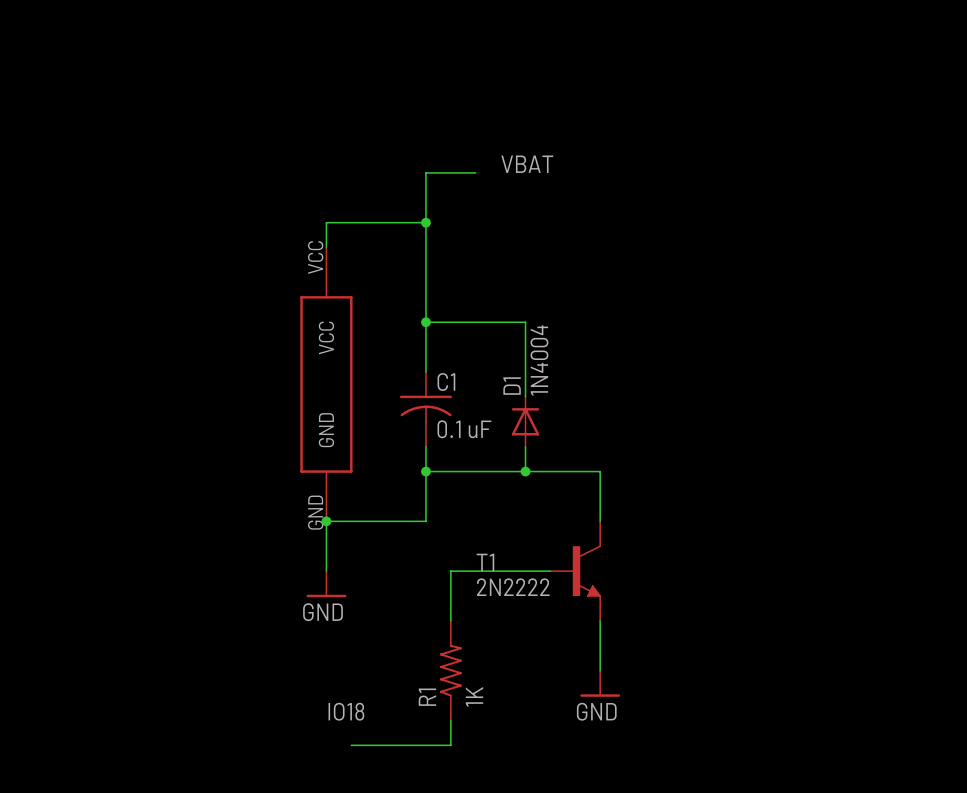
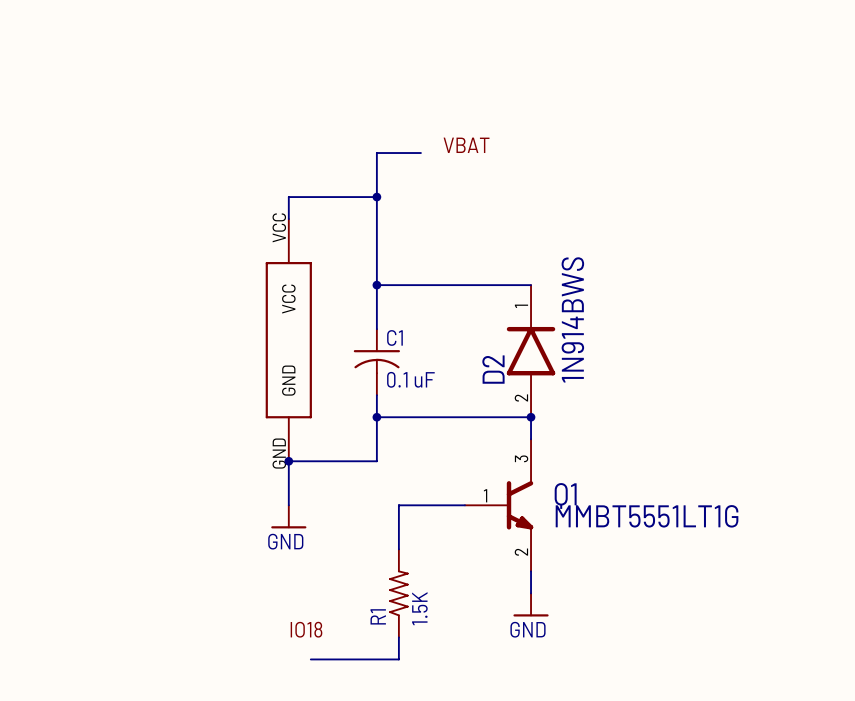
wire: (525, 322) (525, 396) -> (464, 285) (531, 285)
D2: none -> (531, 351)
D1: 1N4004 (525, 421) -> none
wire: (525, 446) (525, 471) -> none
junction: (525, 471) -> none
junction: none -> (531, 417)
Q1: none -> (499, 505)
T1: 2N2222 (575, 571) -> none
R1 value: 1K (474, 696) -> 1.5K (419, 608)

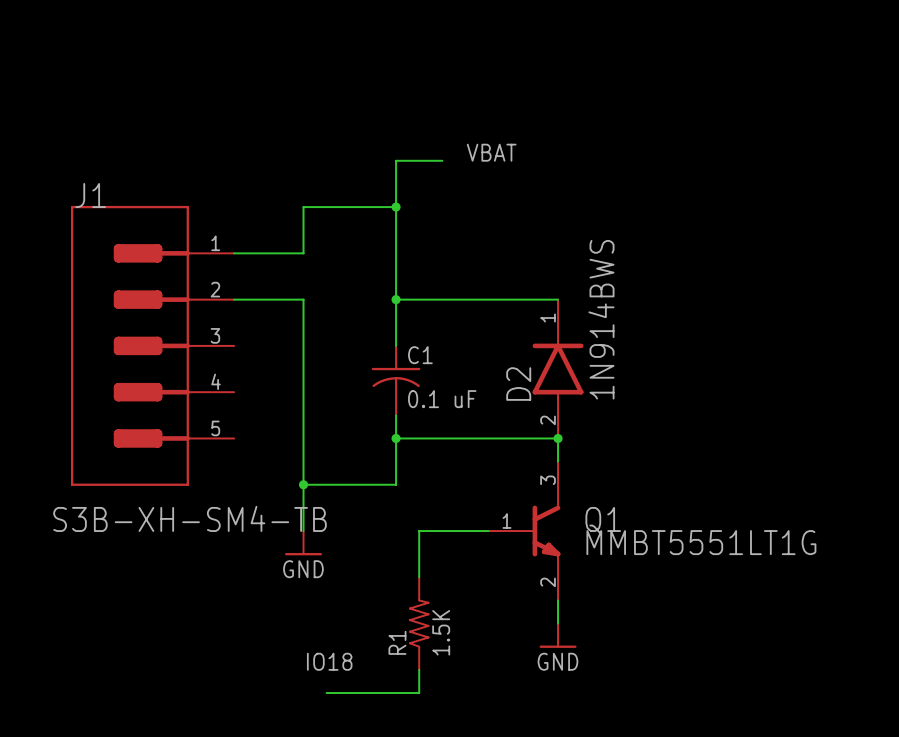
wire: none -> (303, 230) (303, 253) (234, 253)
wire: none -> (234, 299) (303, 299) (303, 484)
J1: none -> (152, 345)
part: (288, 340) -> none

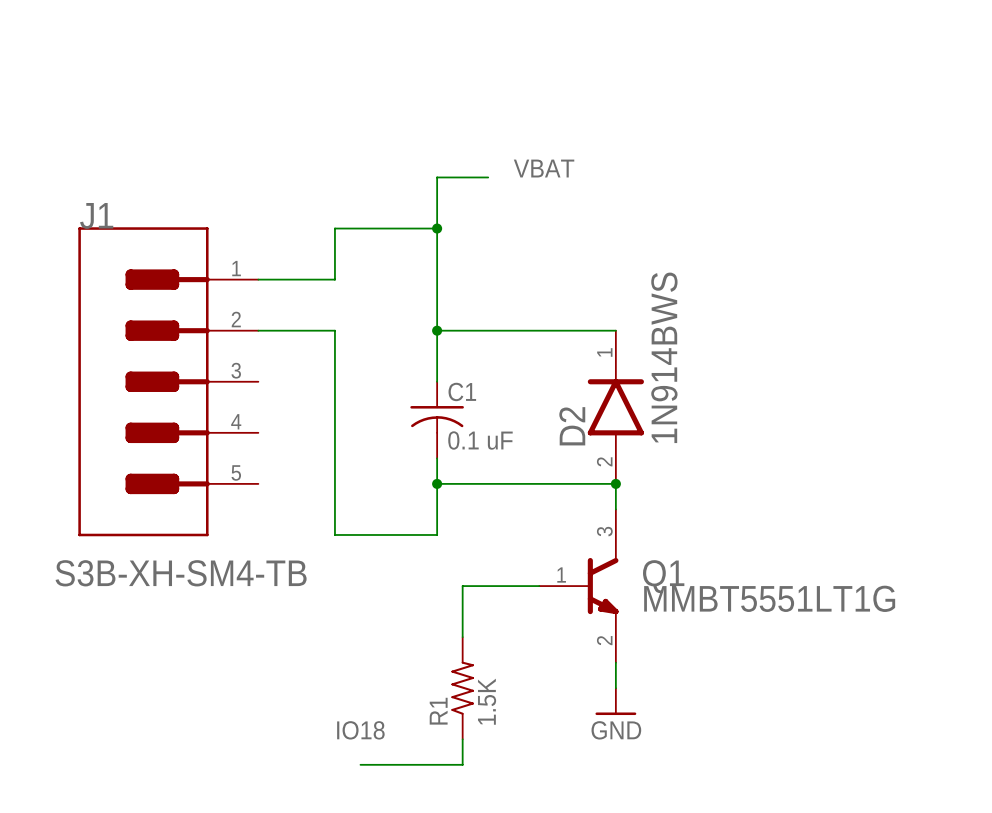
wire: (303, 484) (303, 531) -> none
junction: (303, 484) -> none
power symbol: GND (303, 543) -> none

